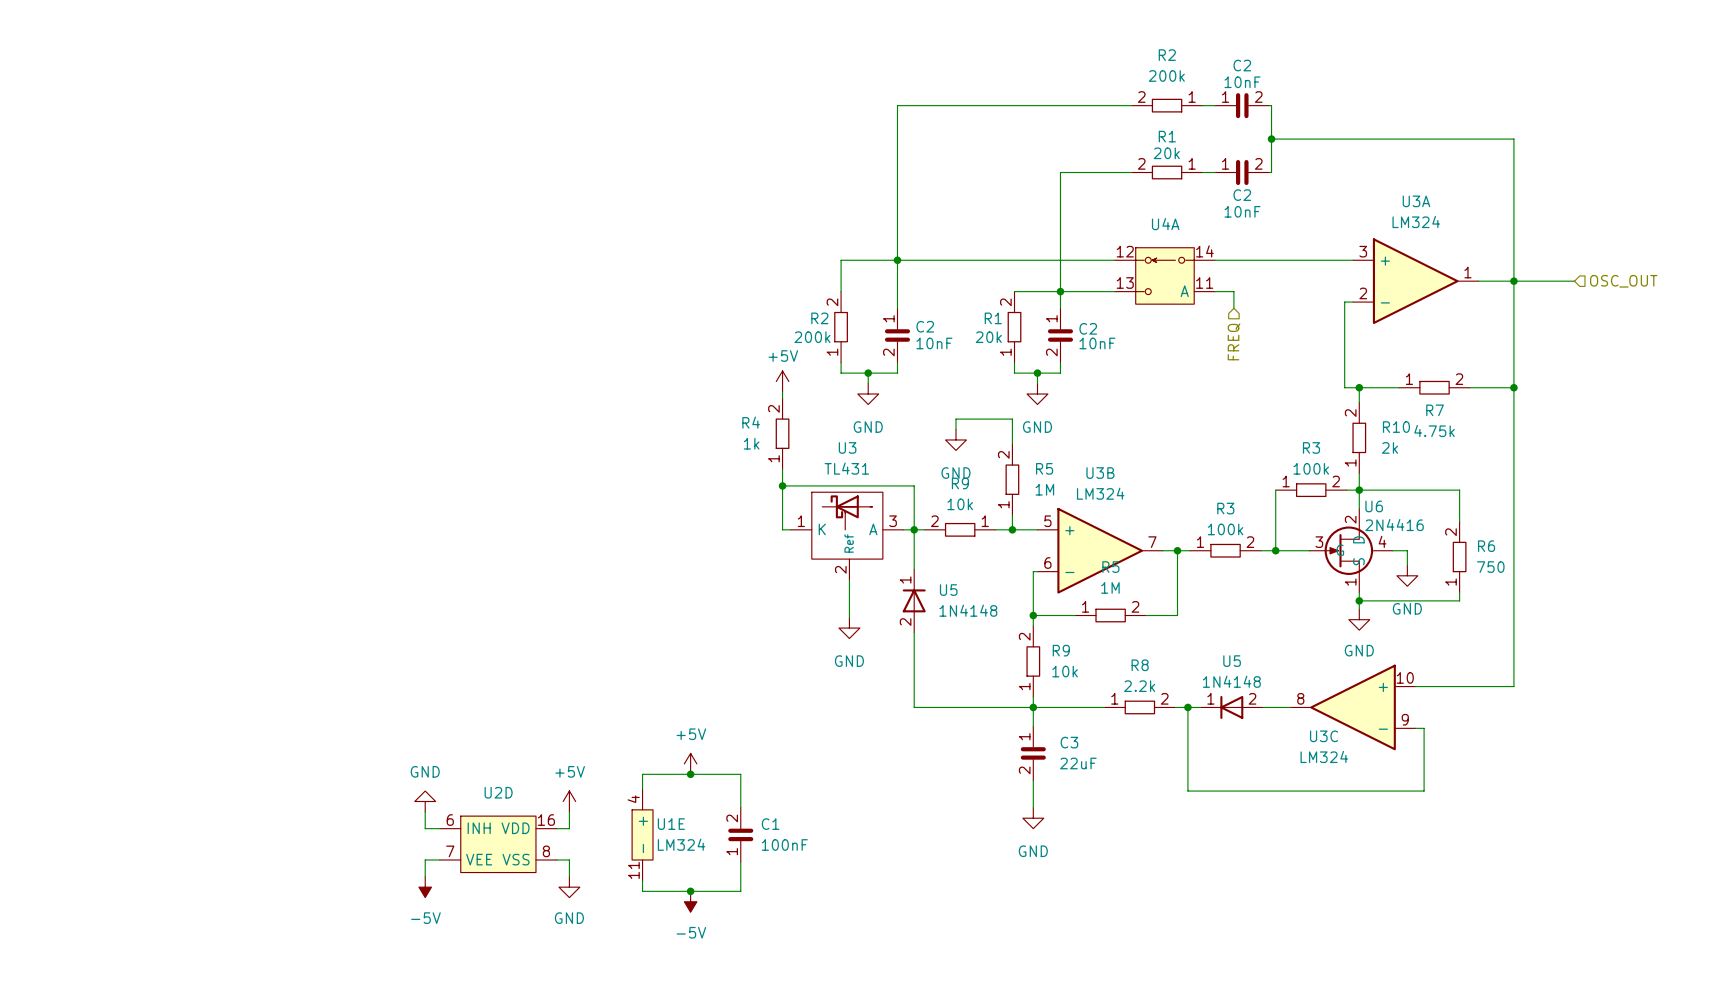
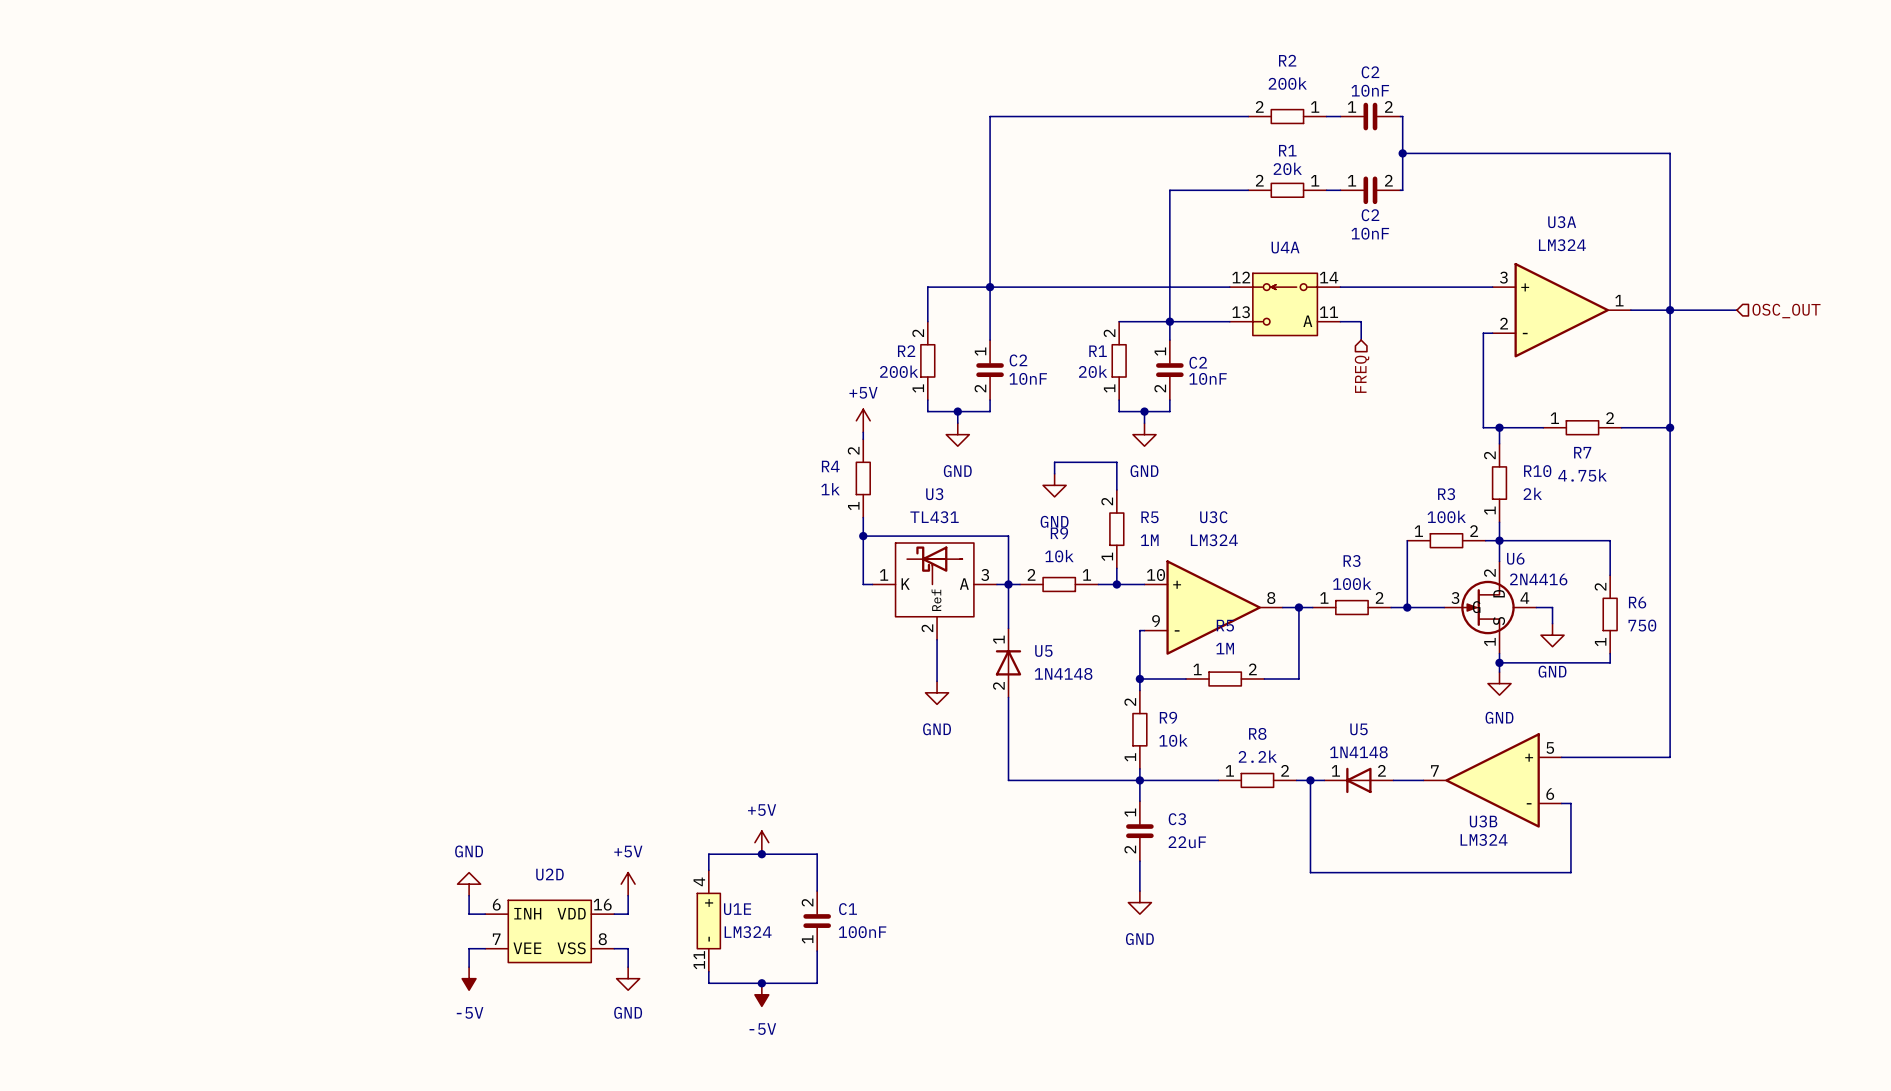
U3B name position: U3B (1100, 473) -> U3B (1483, 821)
U3B value position: LM324 (1100, 493) -> LM324 (1484, 839)
U3B flip: as is (1100, 550) -> left-right (1492, 780)
U3B position: (1100, 550) -> (1492, 780)
U3C flip: as is (1353, 707) -> left-right (1213, 607)
U3C position: (1353, 707) -> (1213, 607)
U3C name position: U3C (1324, 736) -> U3C (1213, 517)
U3C value position: LM324 (1324, 756) -> LM324 (1214, 540)

